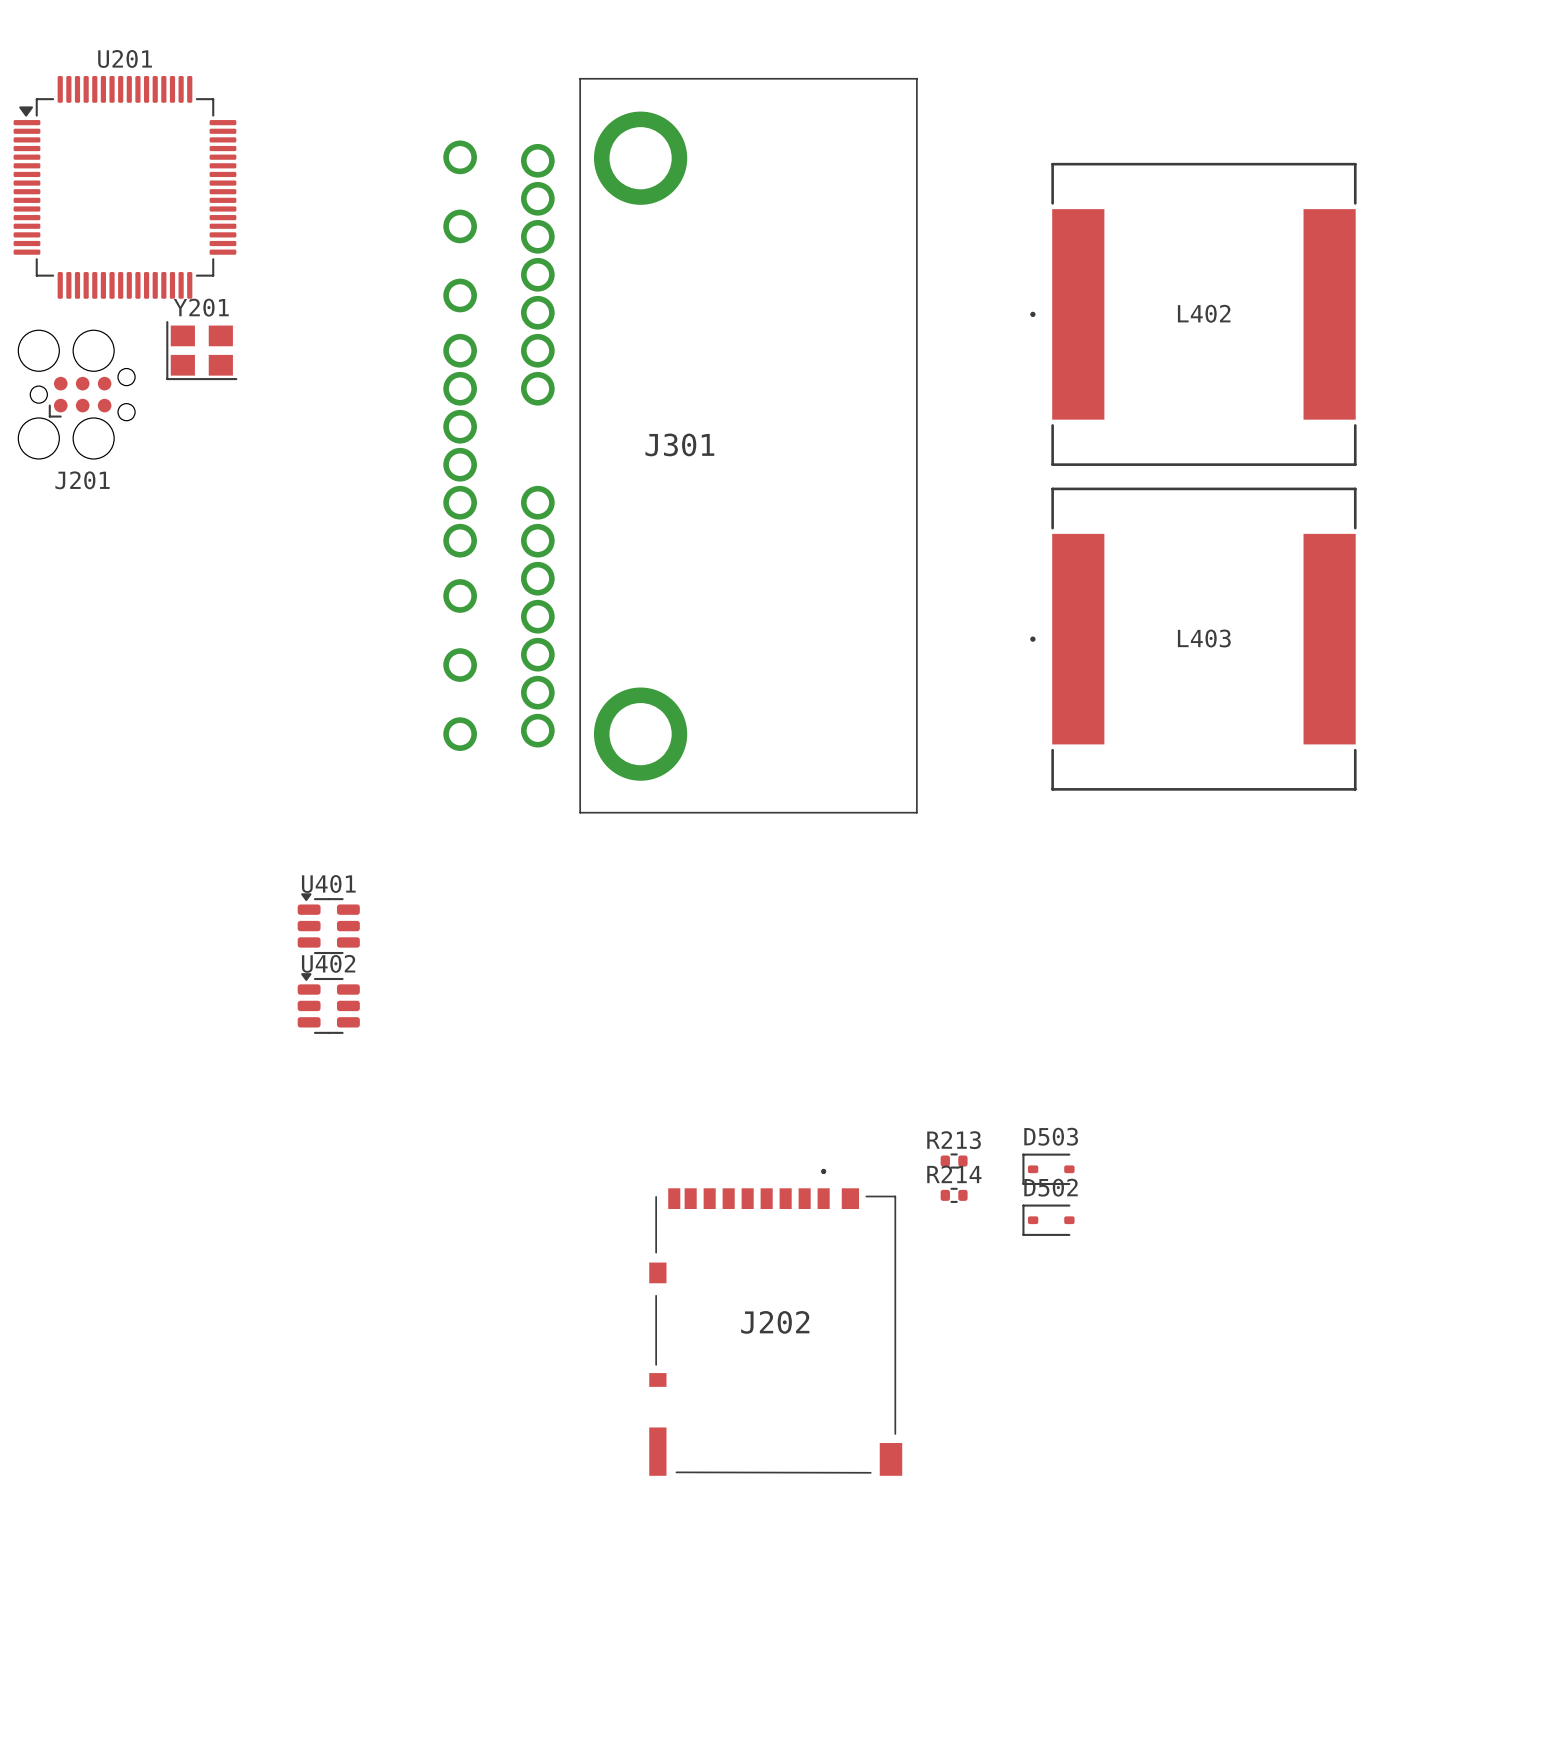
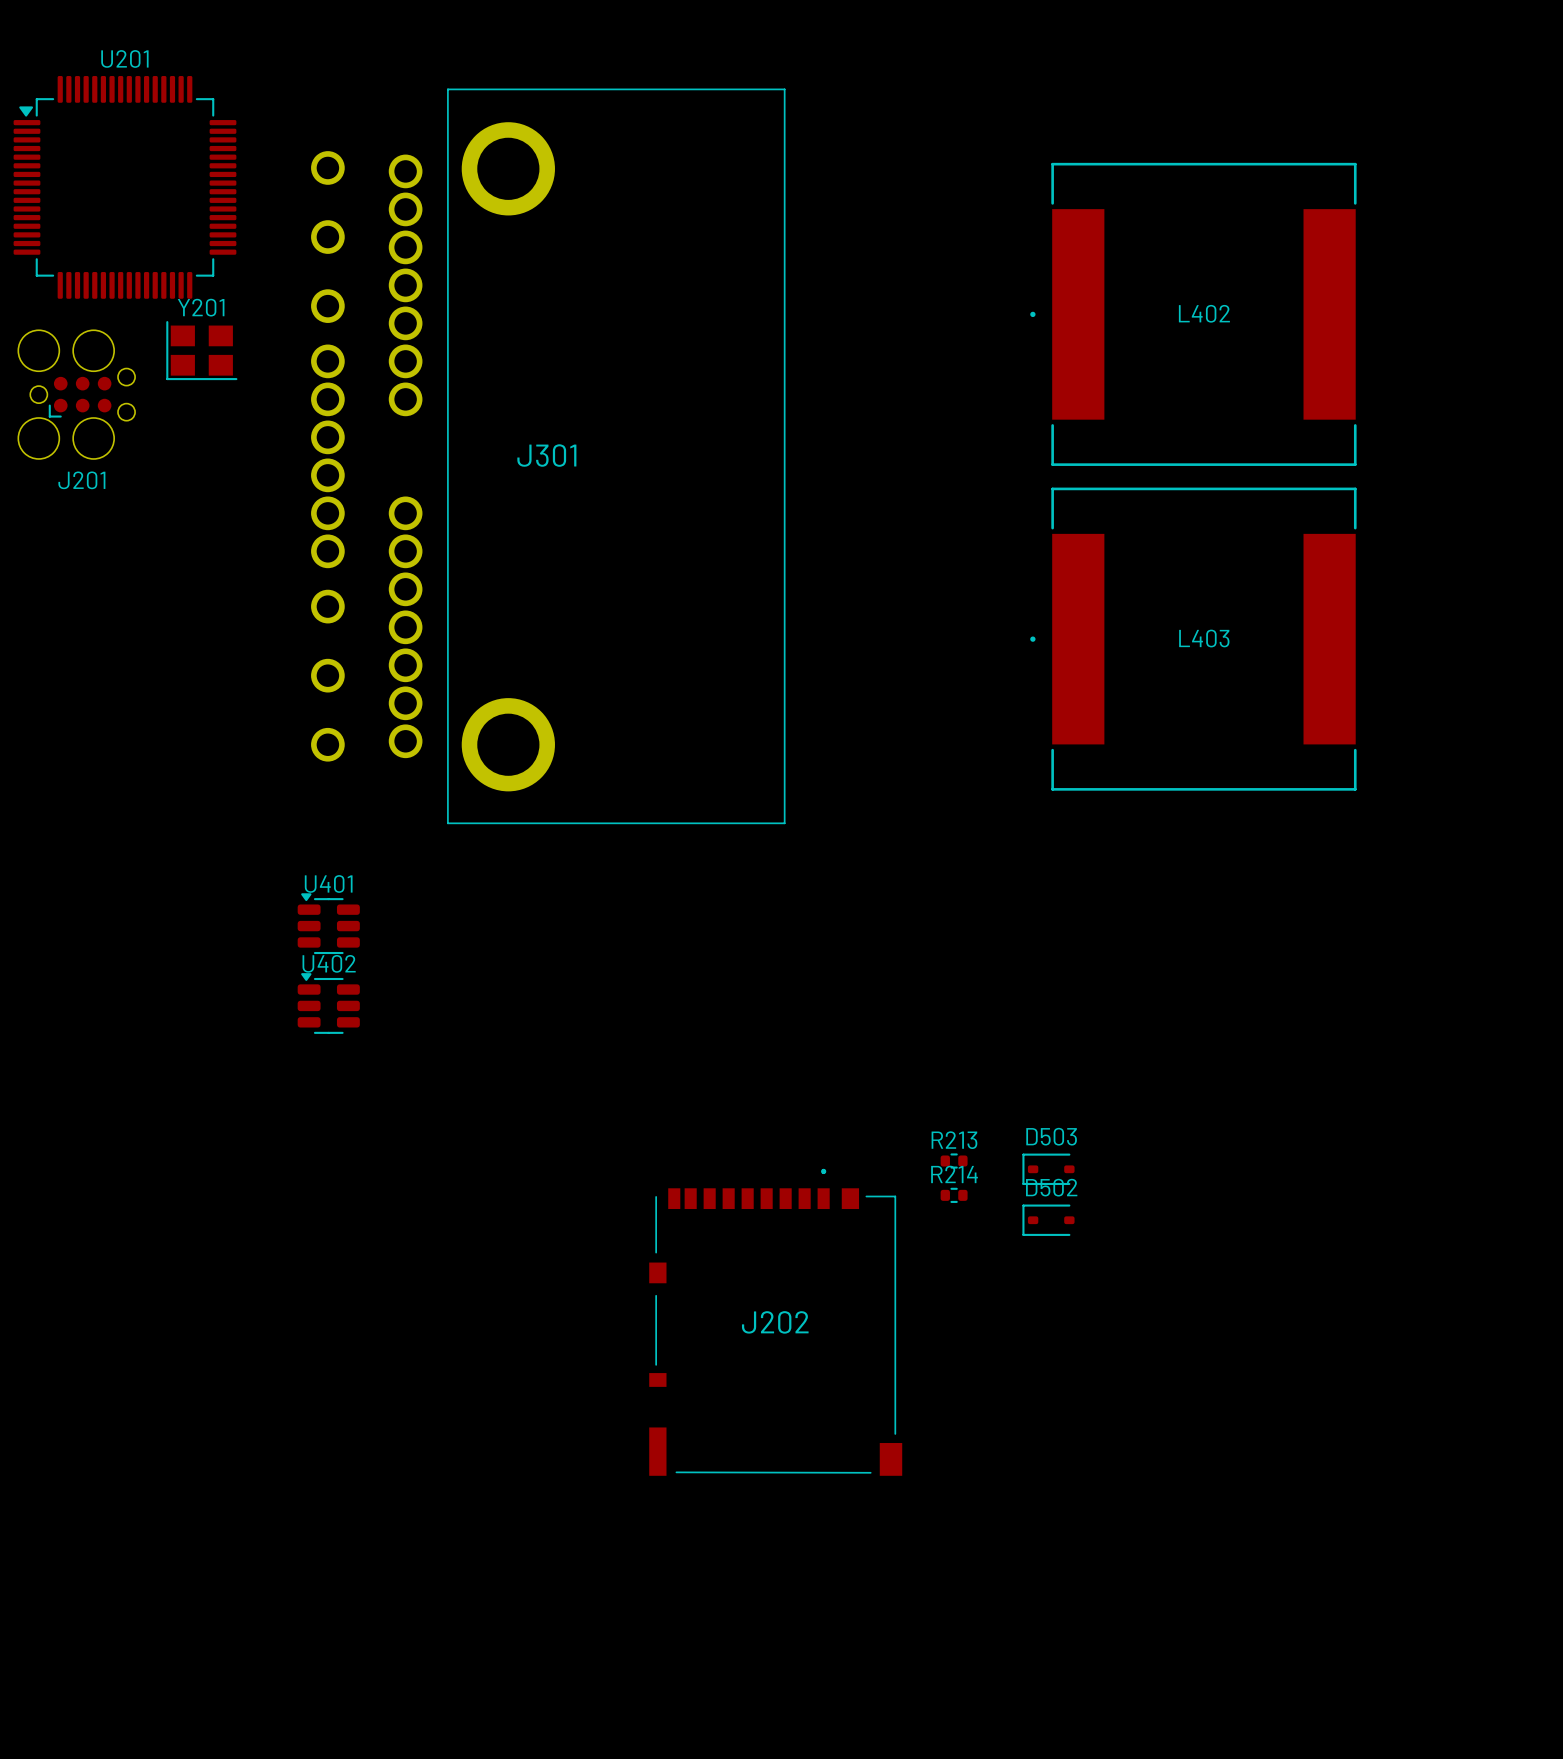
J301 position: (680, 445) -> (548, 456)

